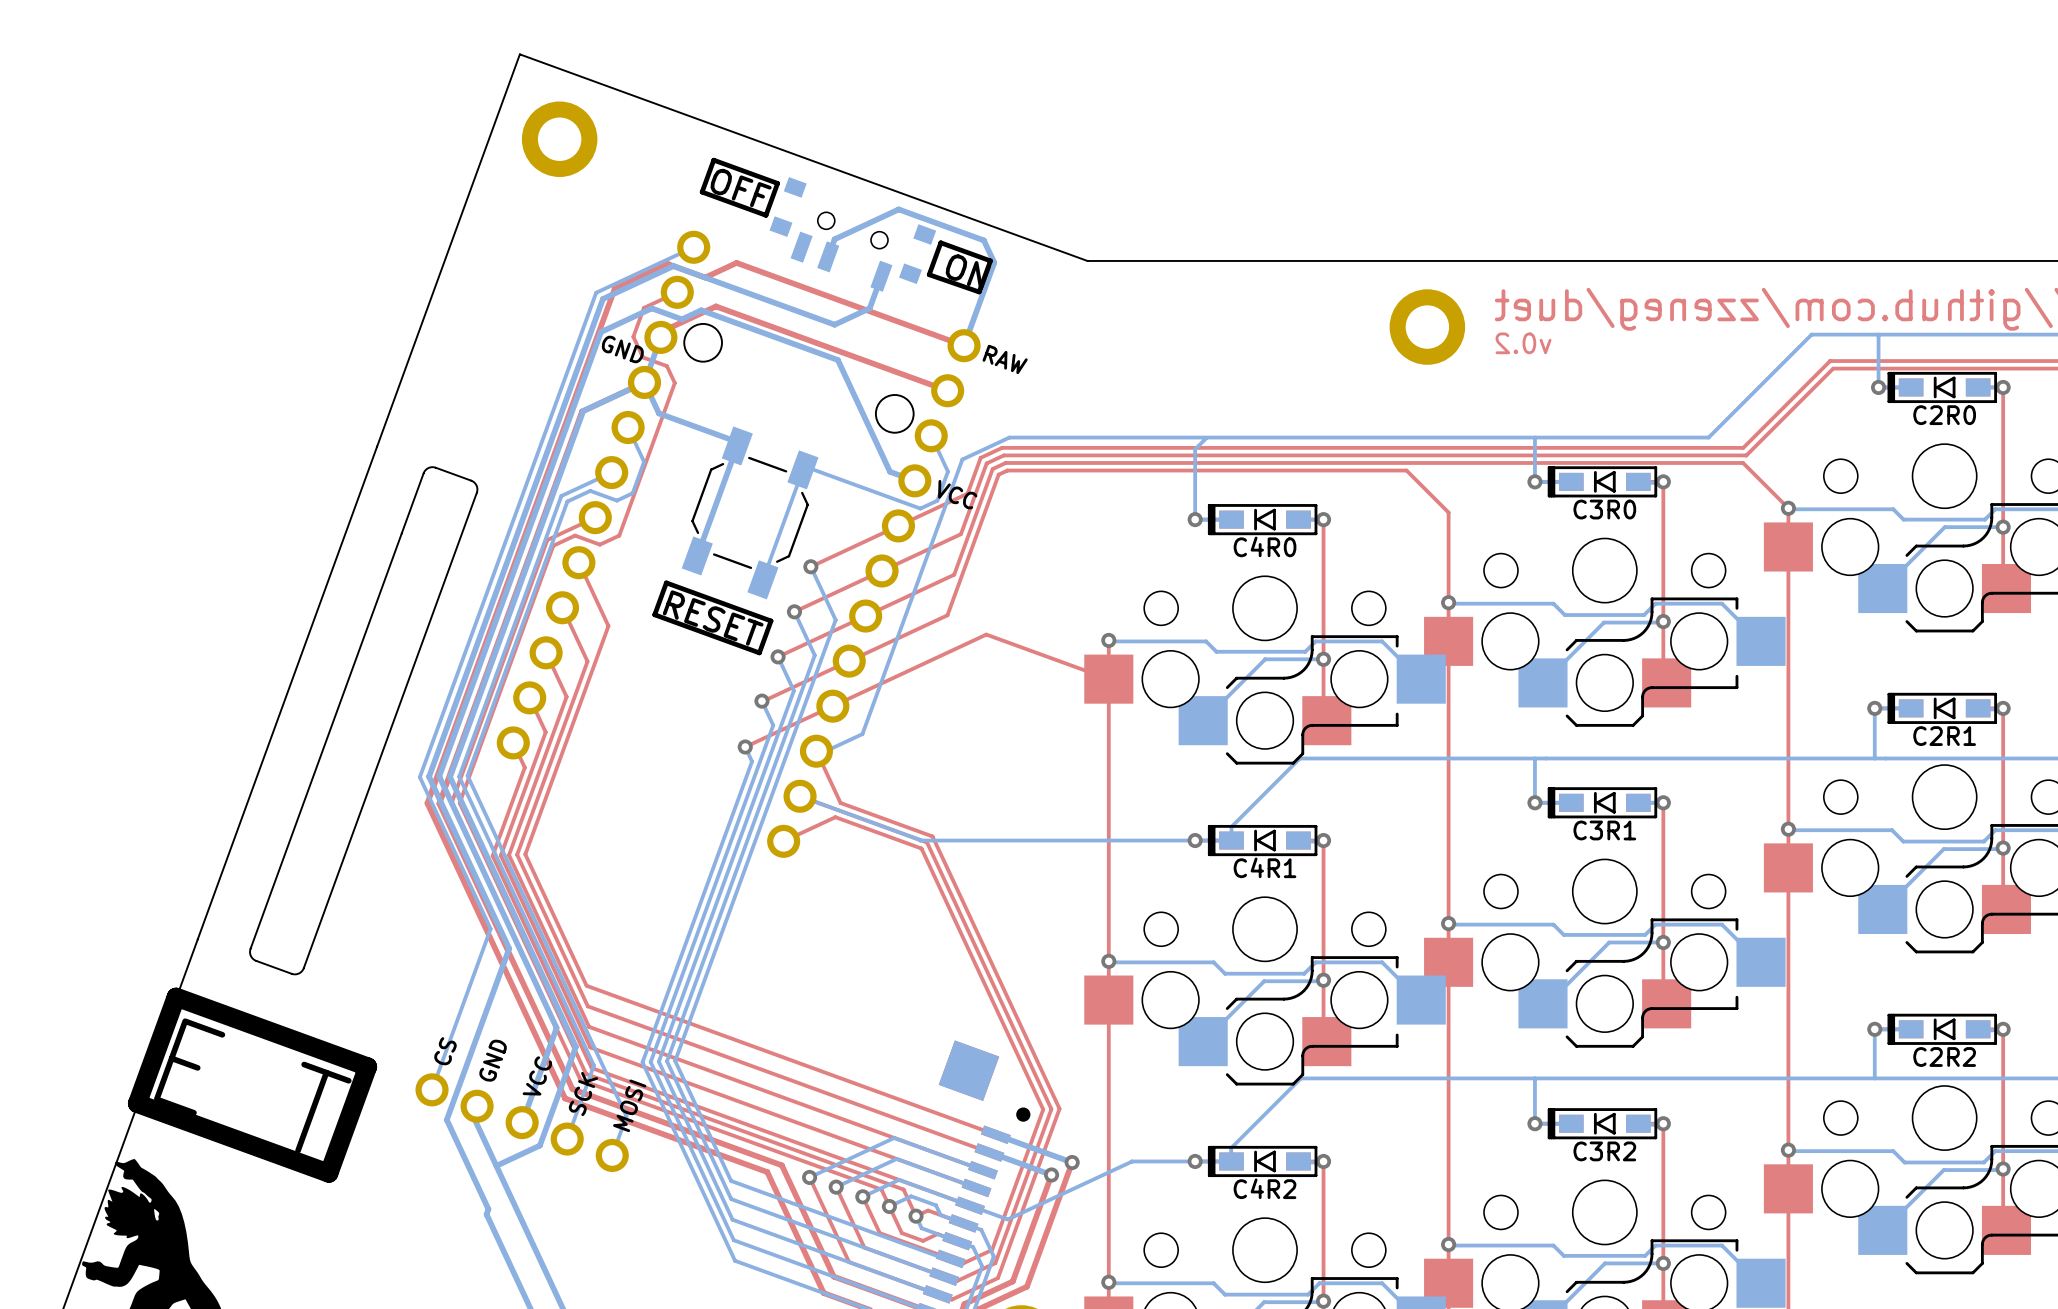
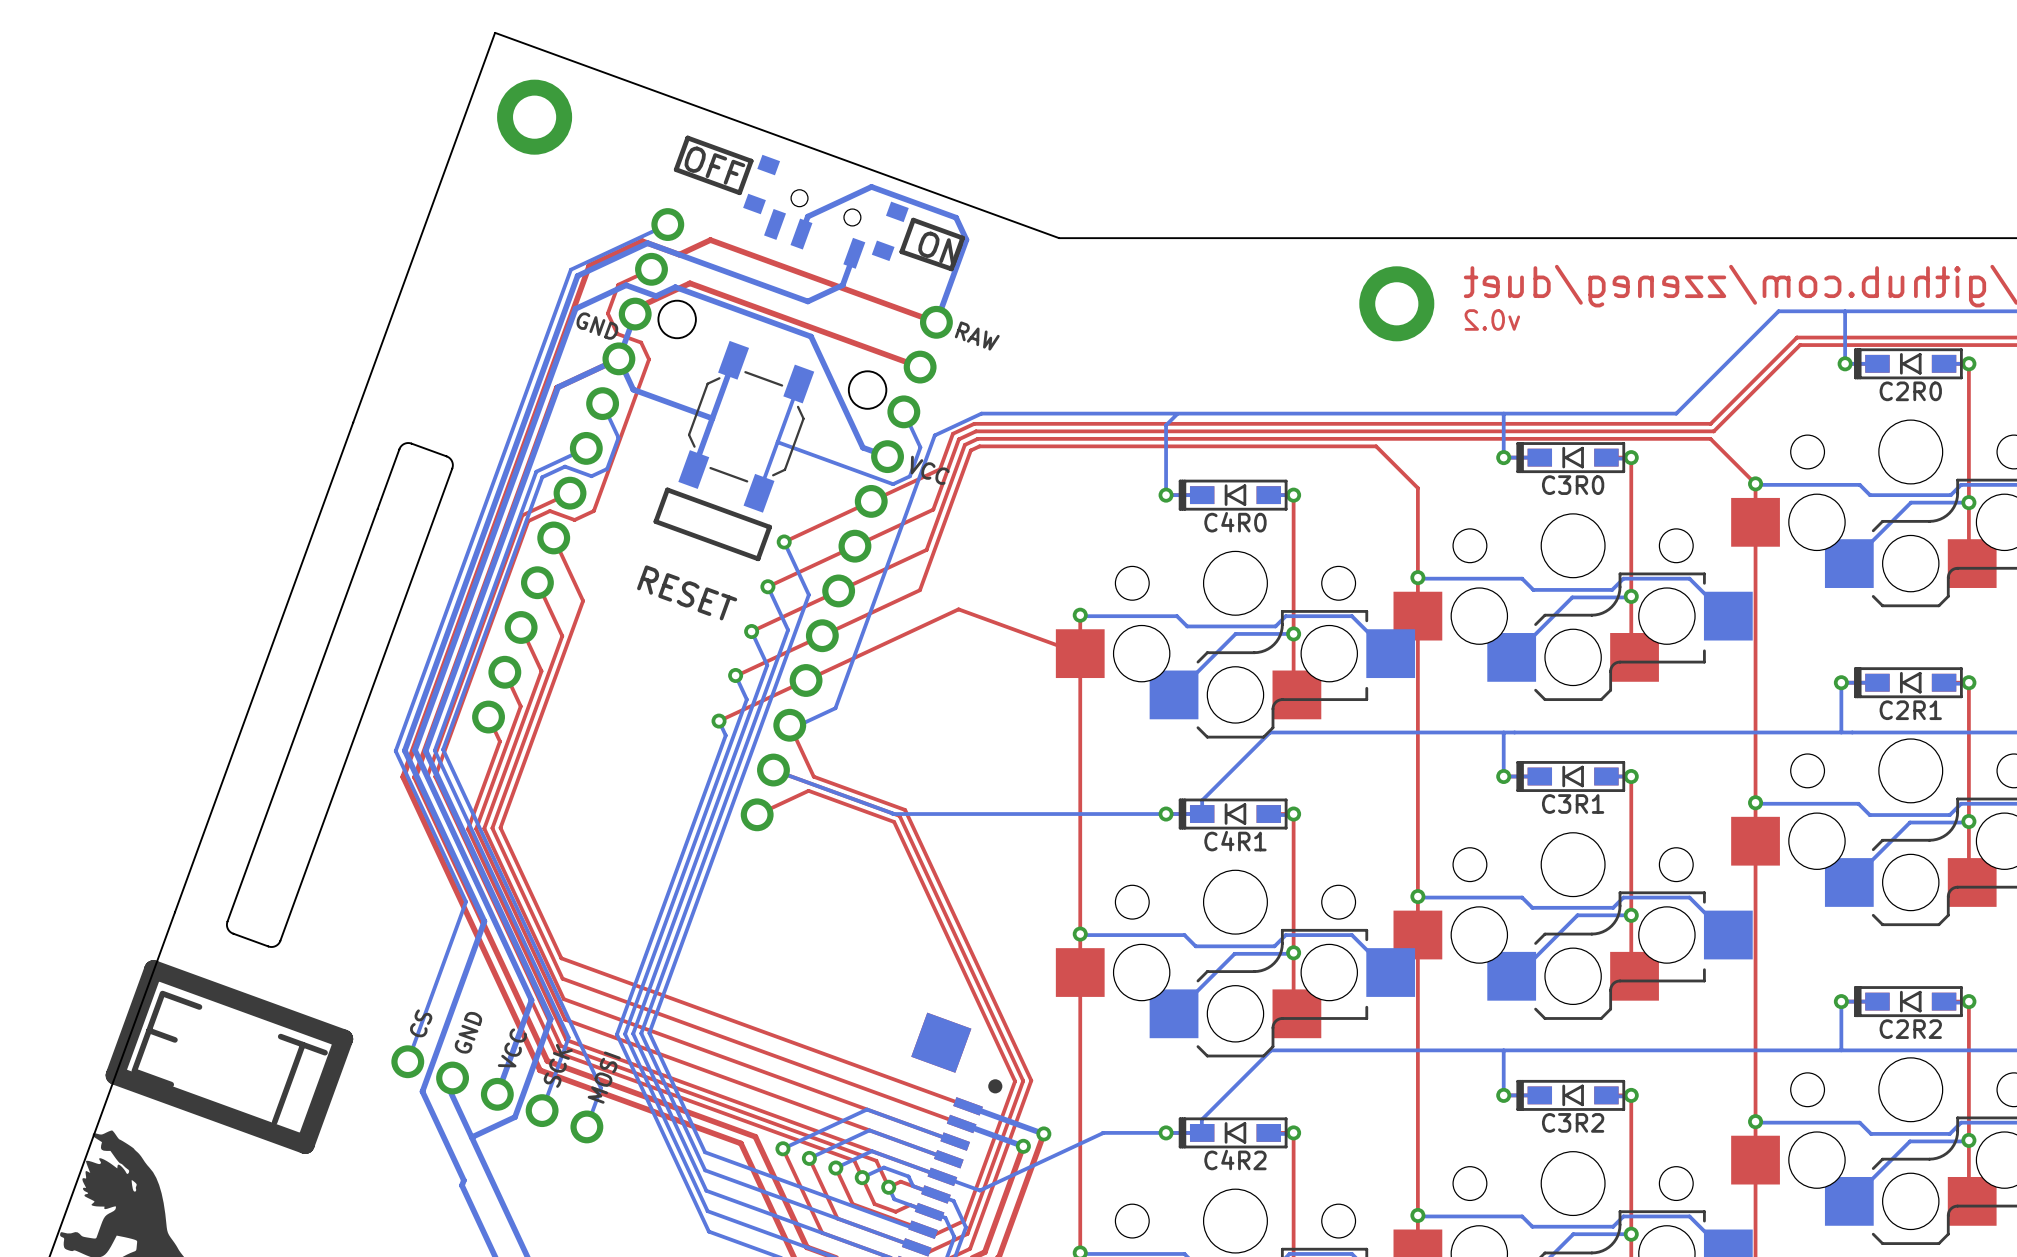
bottom track: (719, 493) (697, 555) -> (733, 360) (711, 421)
part position: (750, 512) -> (746, 426)
line: none -> (667, 489) (769, 527) (758, 558) (655, 521) (667, 489)
bottom track: (785, 517) (762, 579) -> (798, 384) (776, 445)
line: (666, 582) (771, 620) (759, 652) (654, 614) (666, 582) -> none

